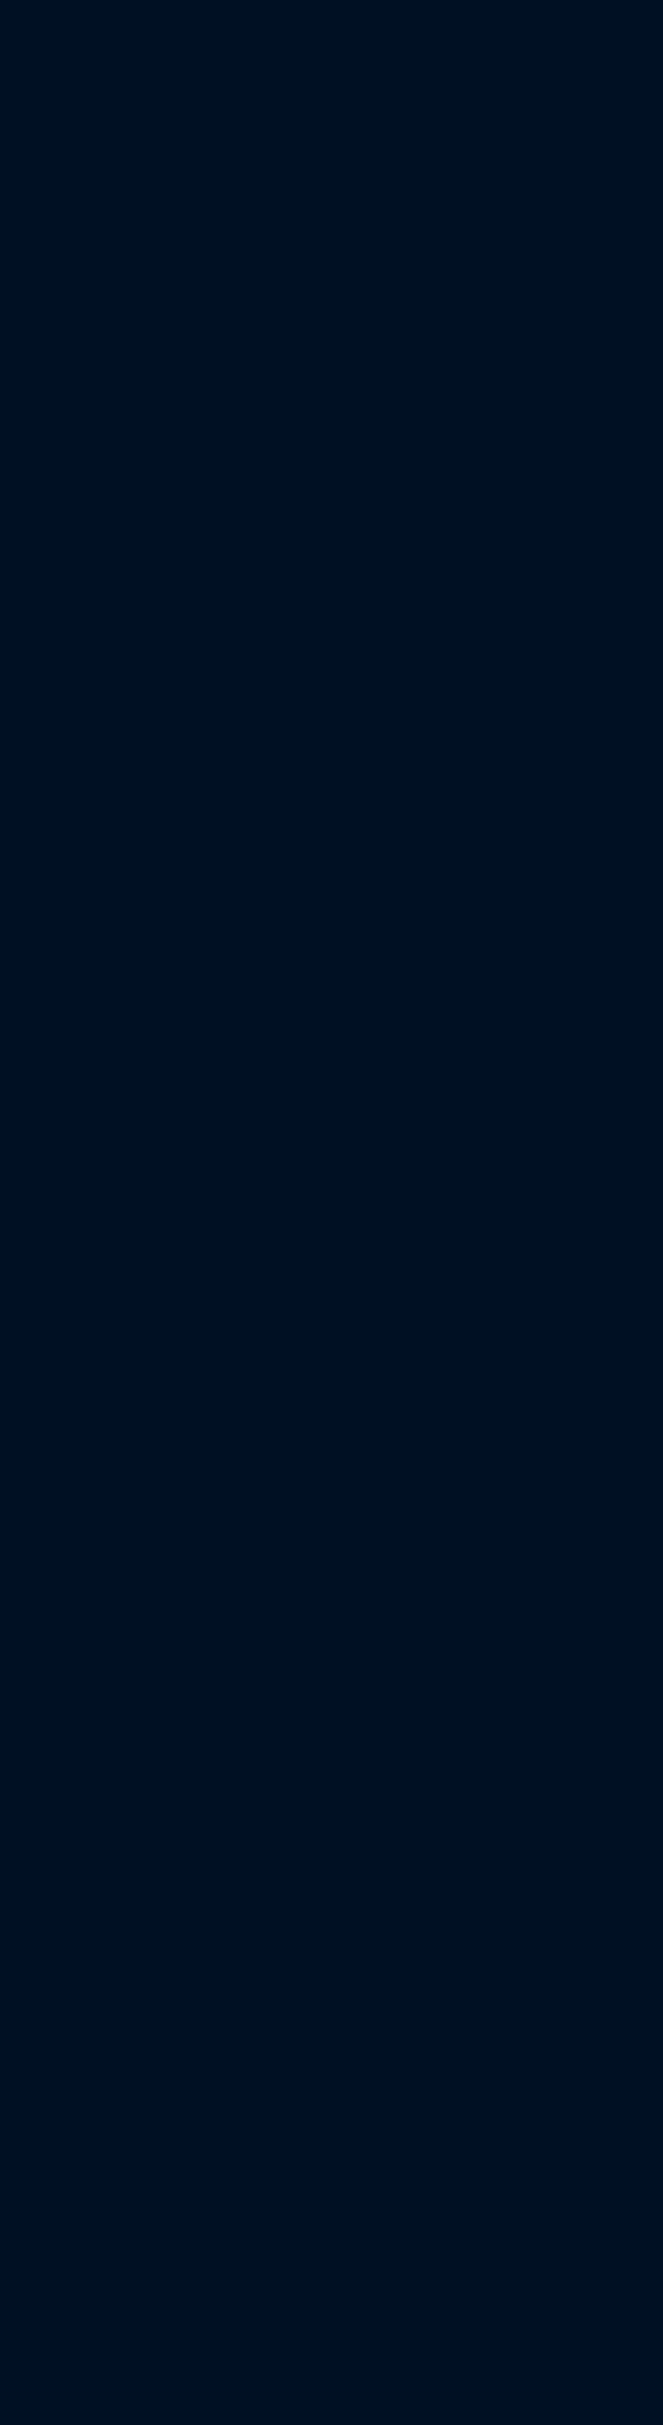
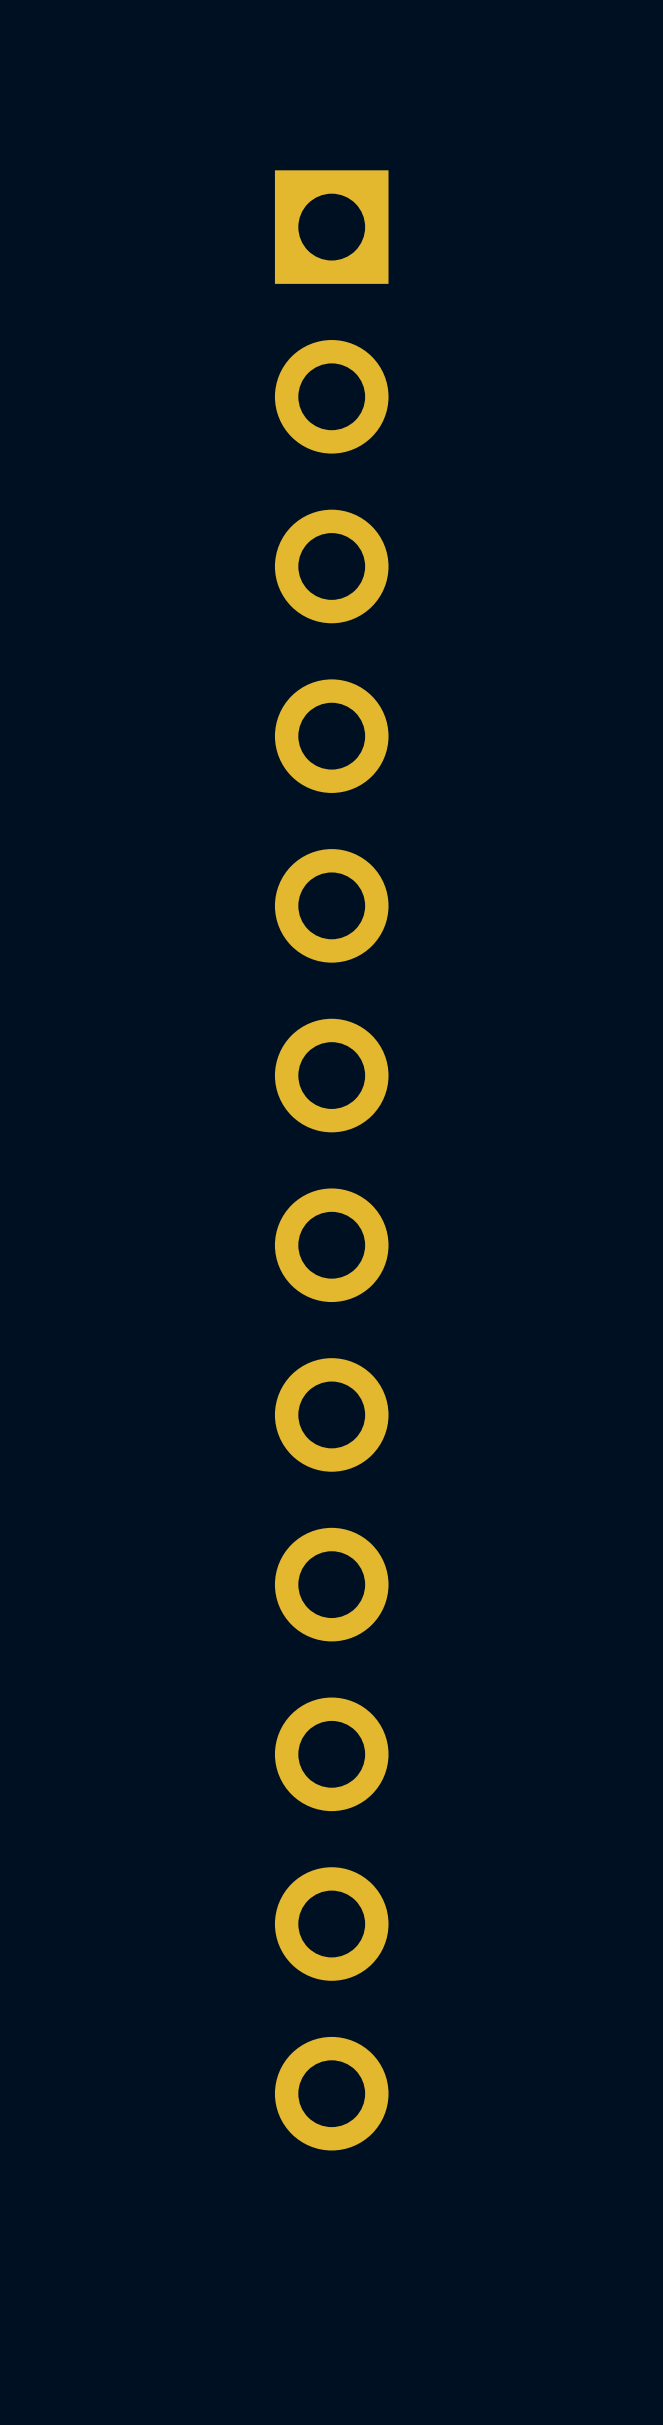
part: none -> (331, 1160)

